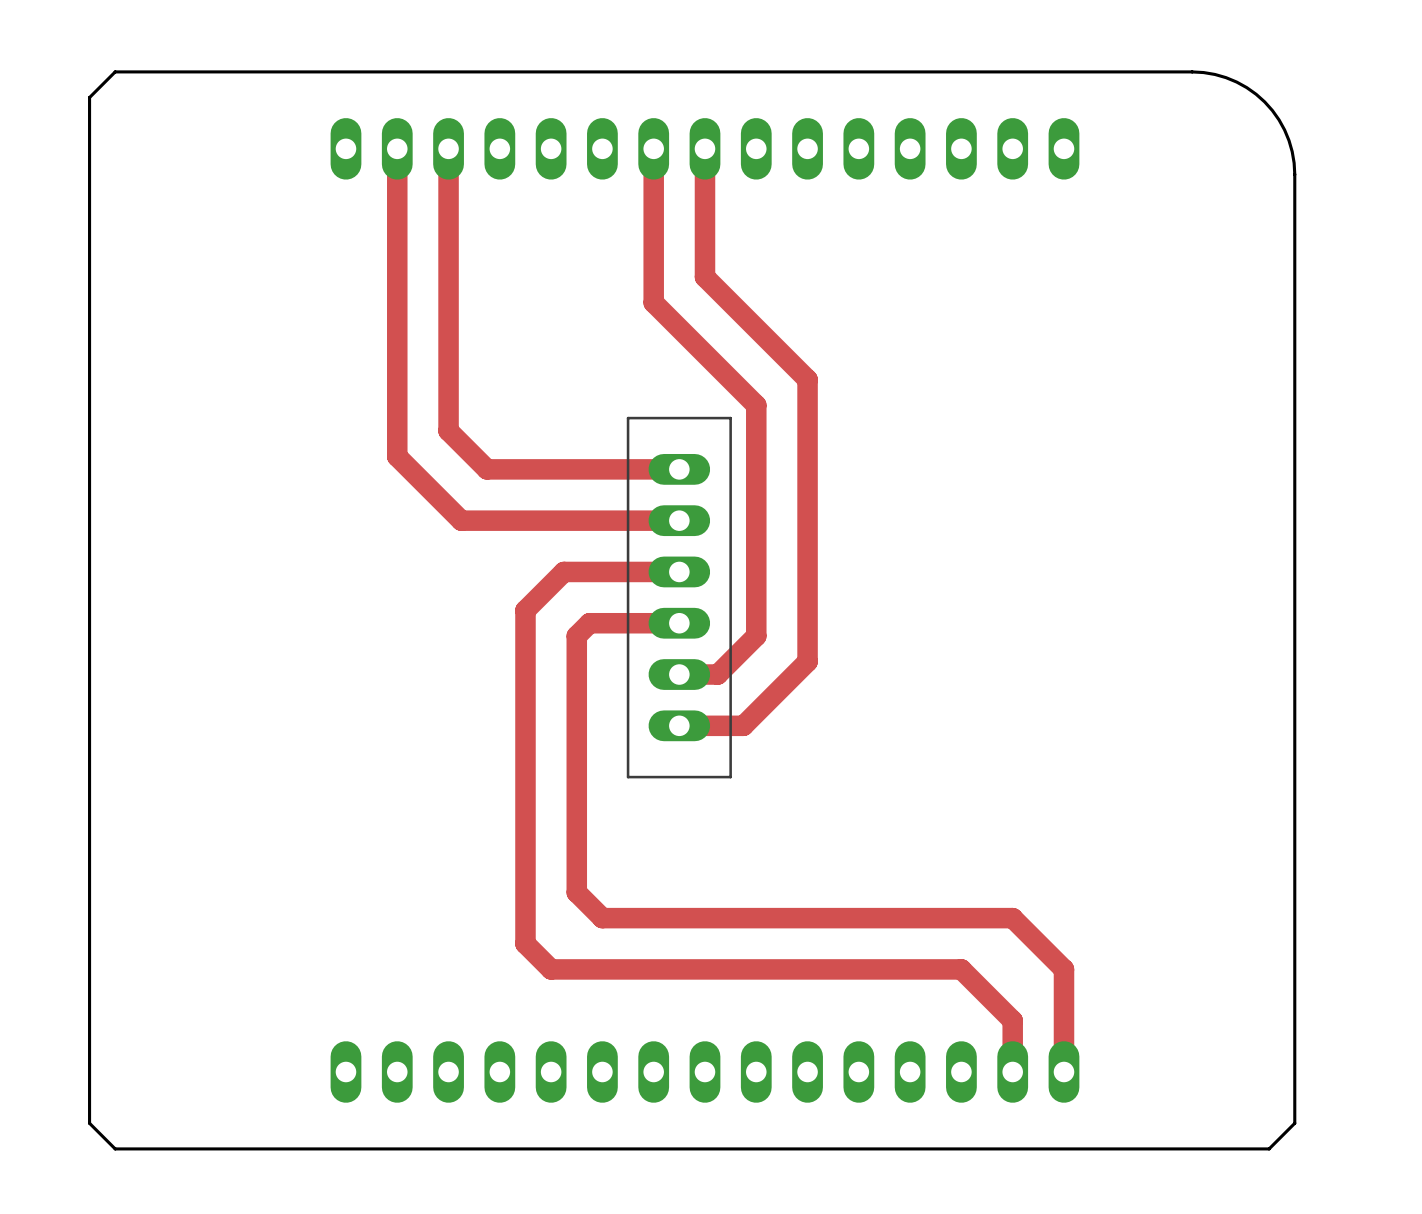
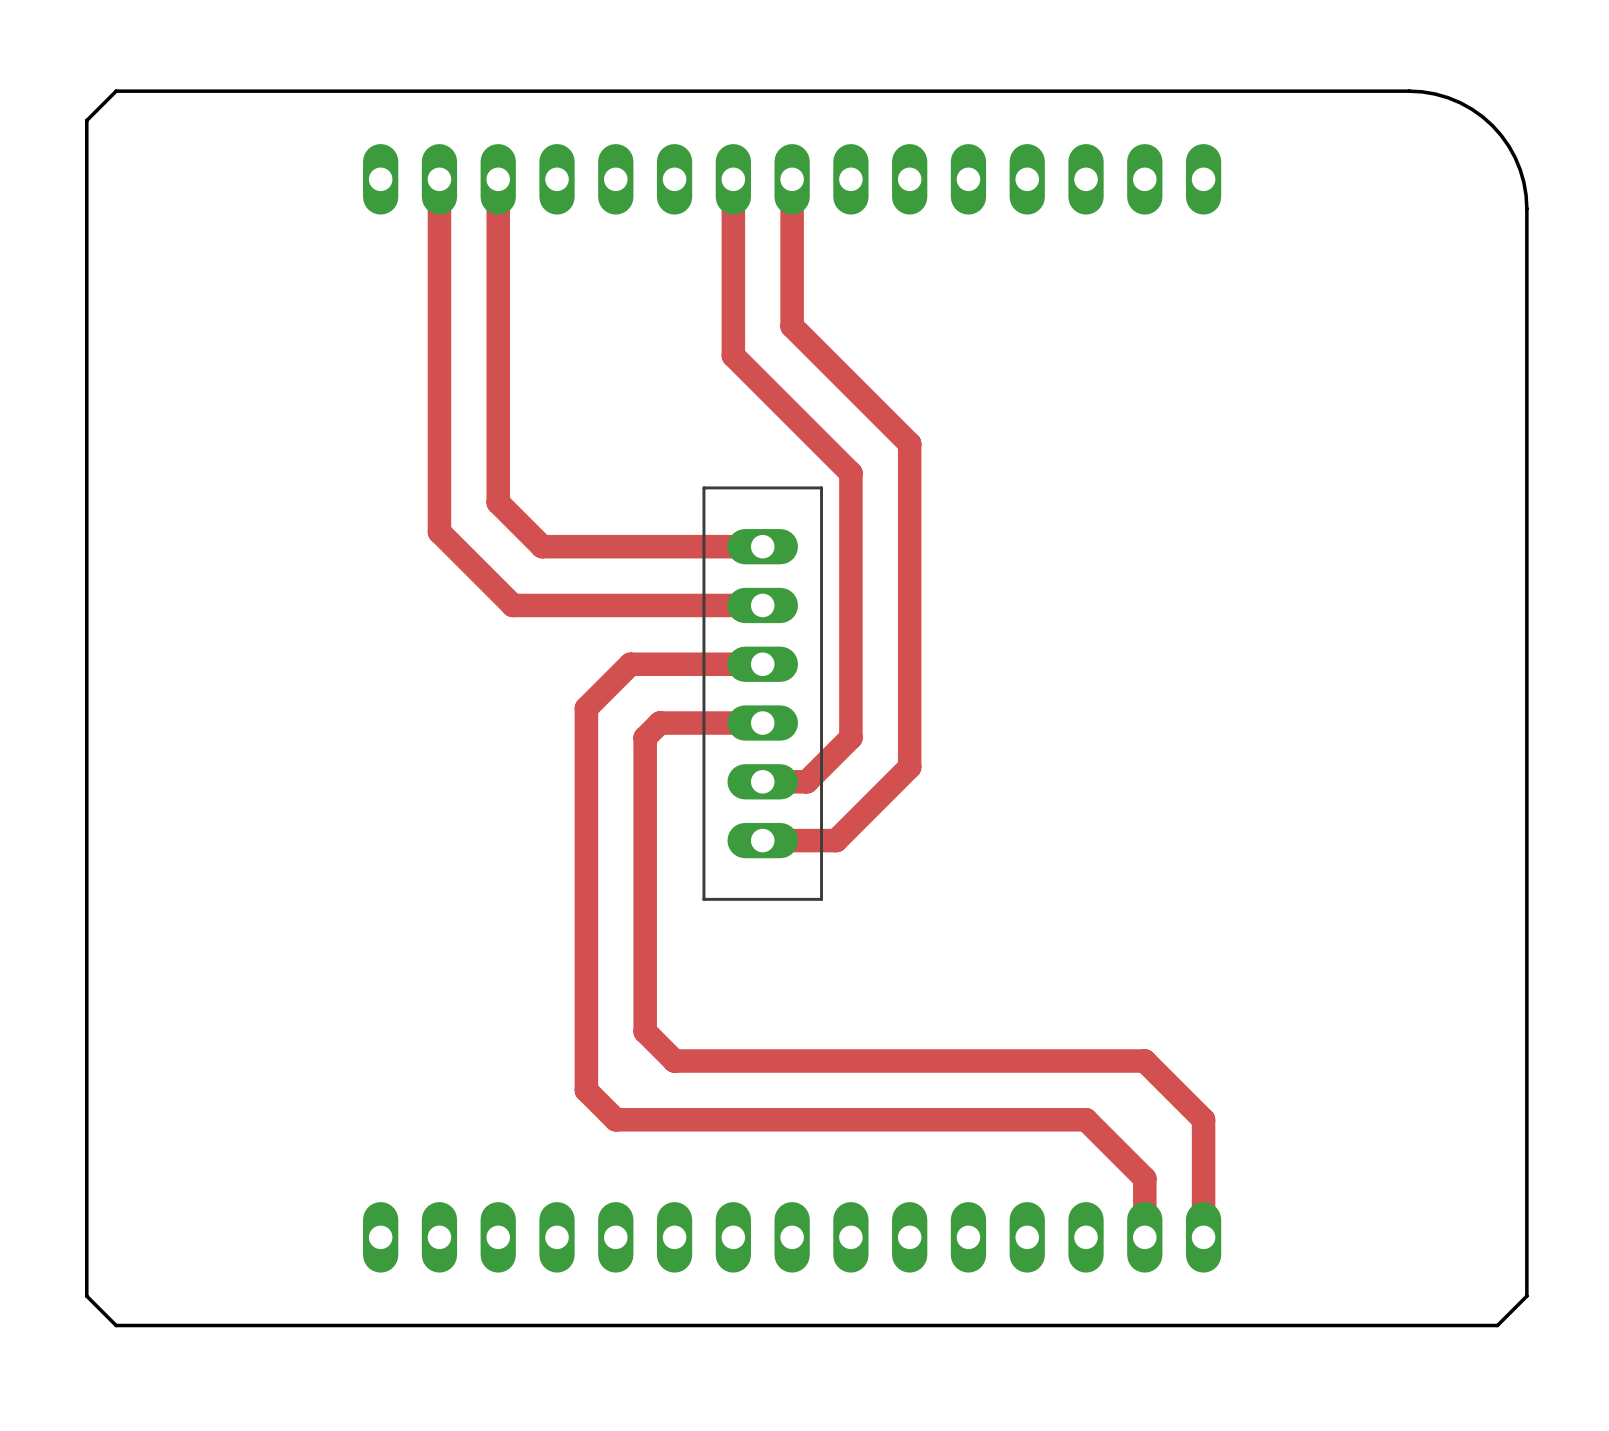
board edge: (1192, 71) (1215, 74) (1236, 82) (1264, 101) (1284, 129) (1294, 163) (1294, 1123) (1269, 1148) -> (1350, 91) (1422, 91) (1448, 97) (1471, 109) (1492, 125) (1508, 146) (1520, 169) (1526, 195) (1526, 1296) (1497, 1325) (1438, 1325)

